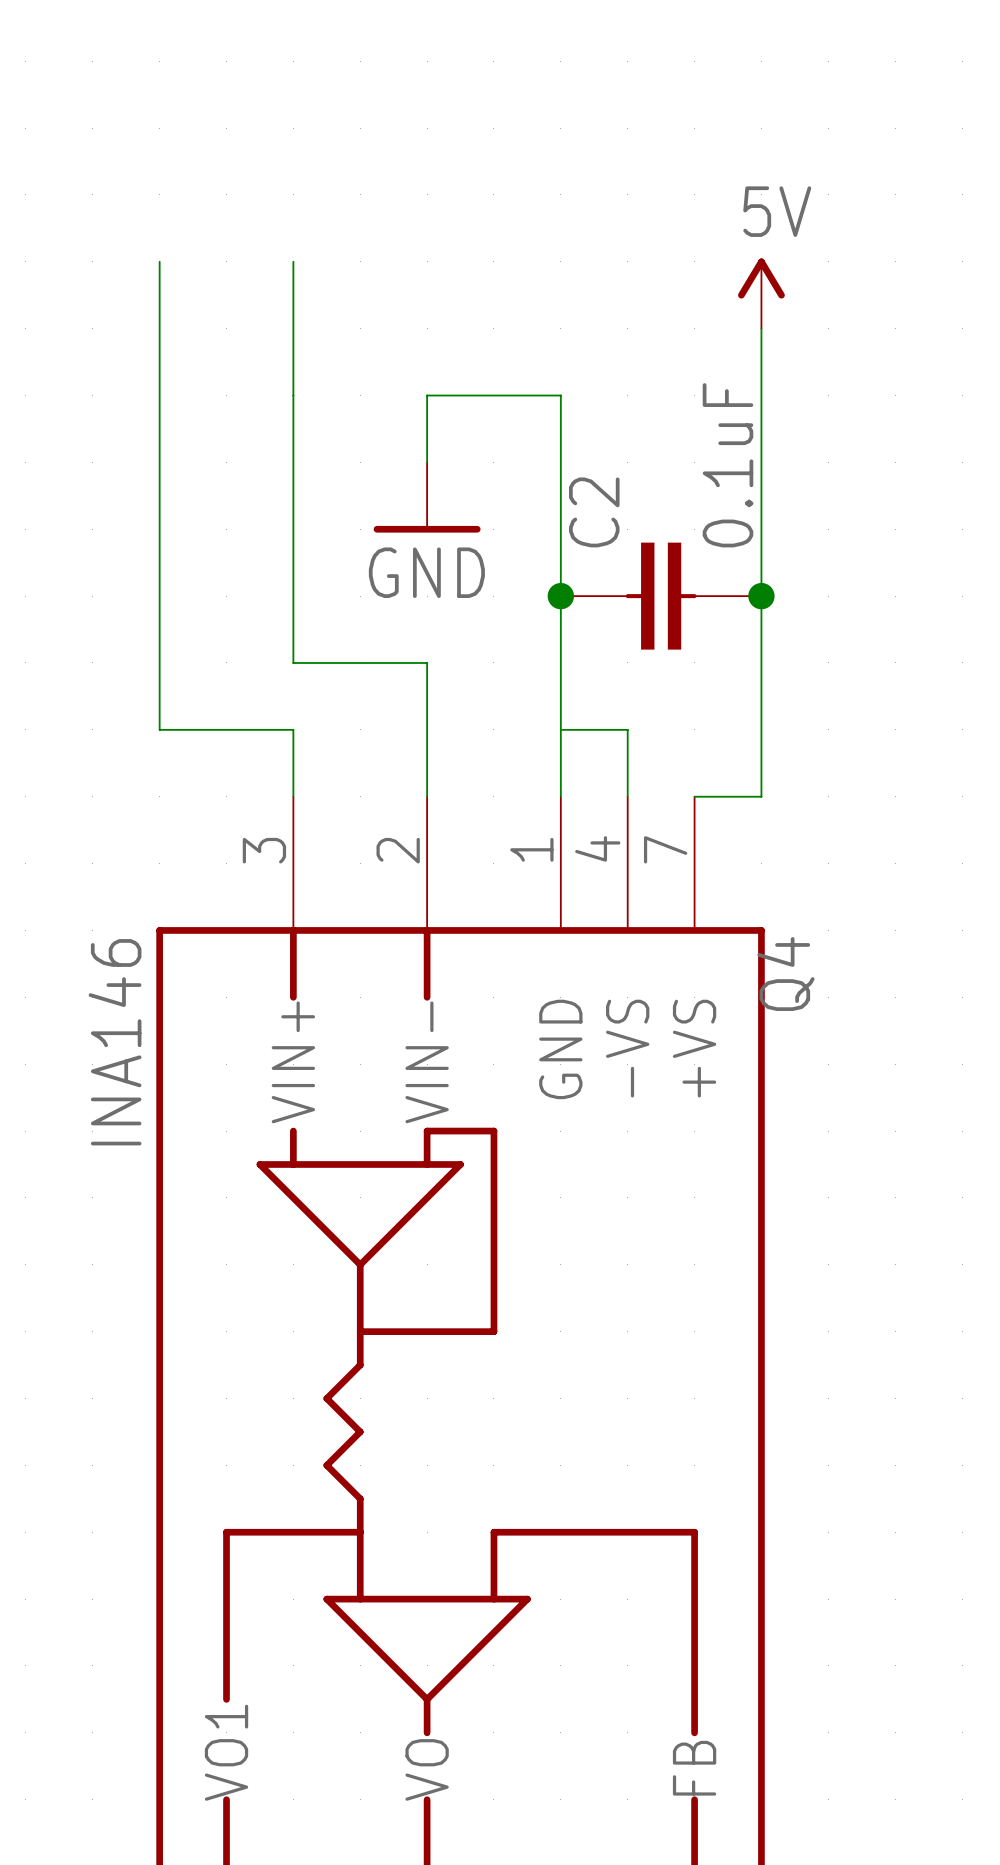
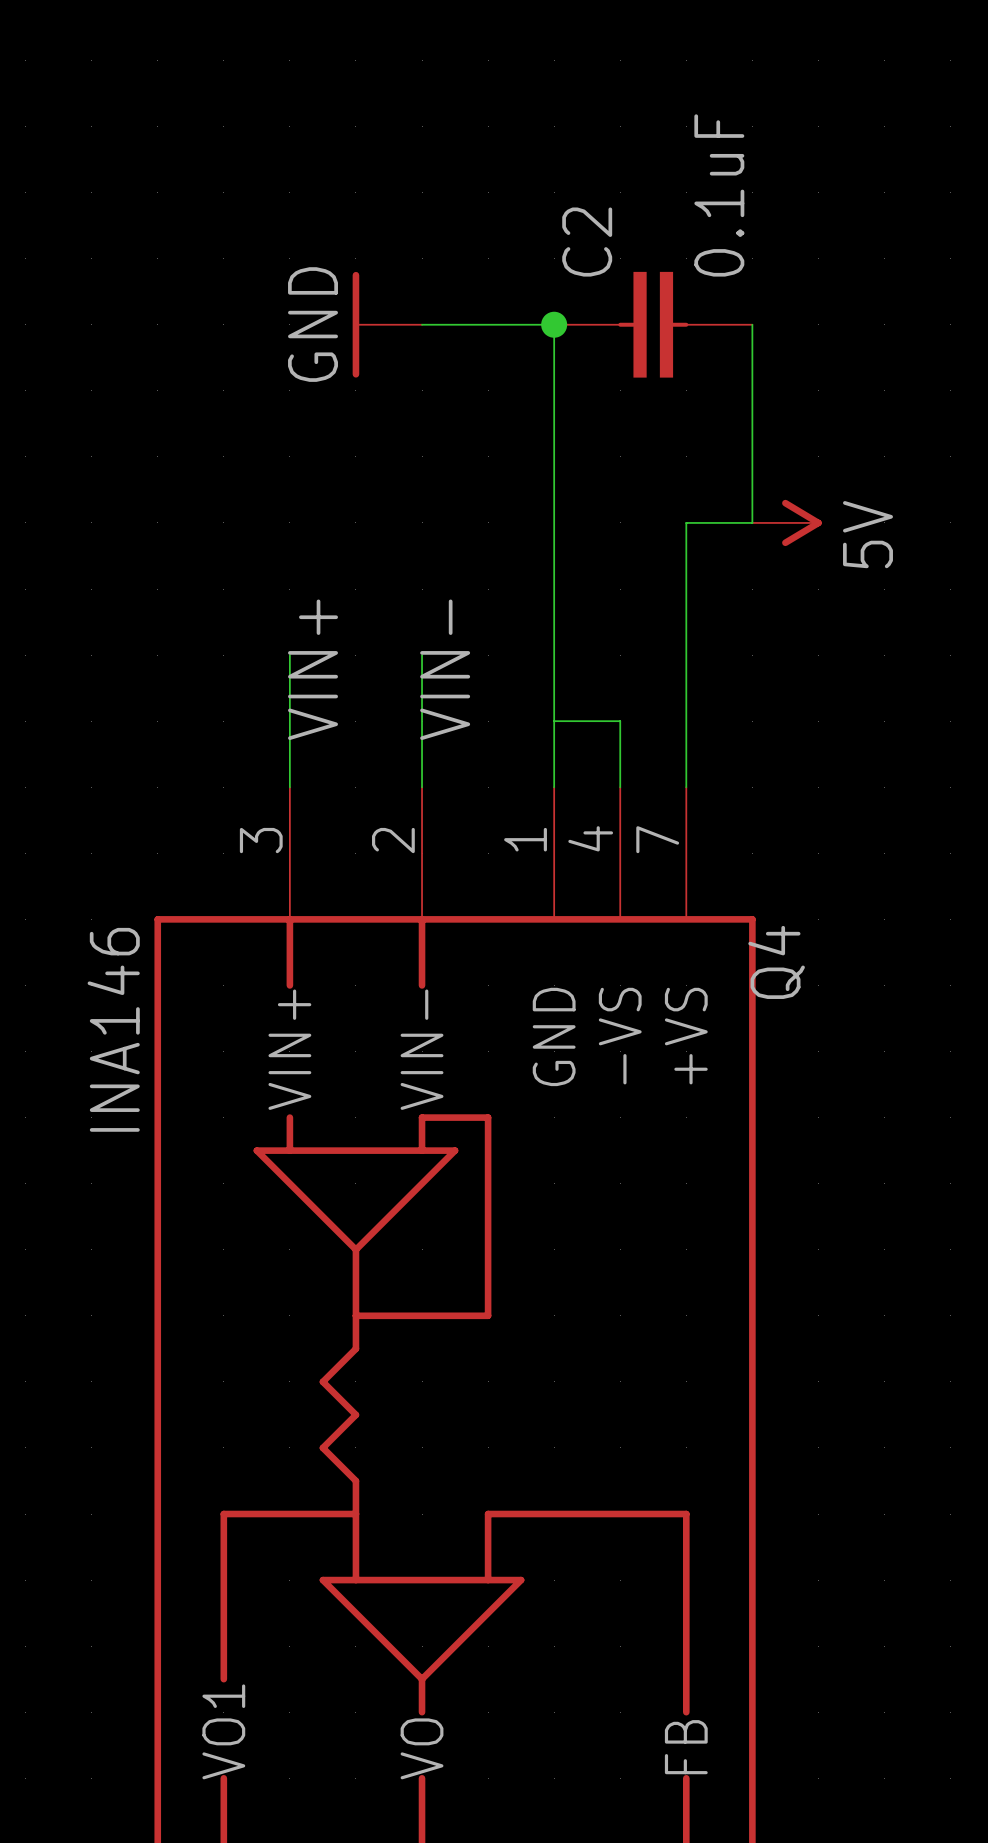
wire: (159, 261) (159, 729) (293, 729) -> (289, 655) (289, 721)
wire: (293, 261) (293, 662) (427, 662) -> none
power symbol rotation: 0° (761, 278) -> 90° clockwise (801, 522)
power symbol position: 5V (761, 293) -> 5V (787, 522)
junction: none -> (554, 324)
wire: (560, 395) (427, 395) (427, 462) -> (554, 390) (554, 324) (422, 324)
power symbol position: GND (427, 497) -> GND (387, 324)
power symbol rotation: 0° (427, 529) -> 90° clockwise (355, 324)
wire: (761, 529) (761, 796) (694, 796) -> (752, 522) (686, 522) (686, 787)
junction: (560, 596) -> none
C2 position: (661, 596) -> (653, 324)
junction: (761, 596) -> none
label: none -> VIN+ (313, 669)
label: none -> VIN- (445, 669)

